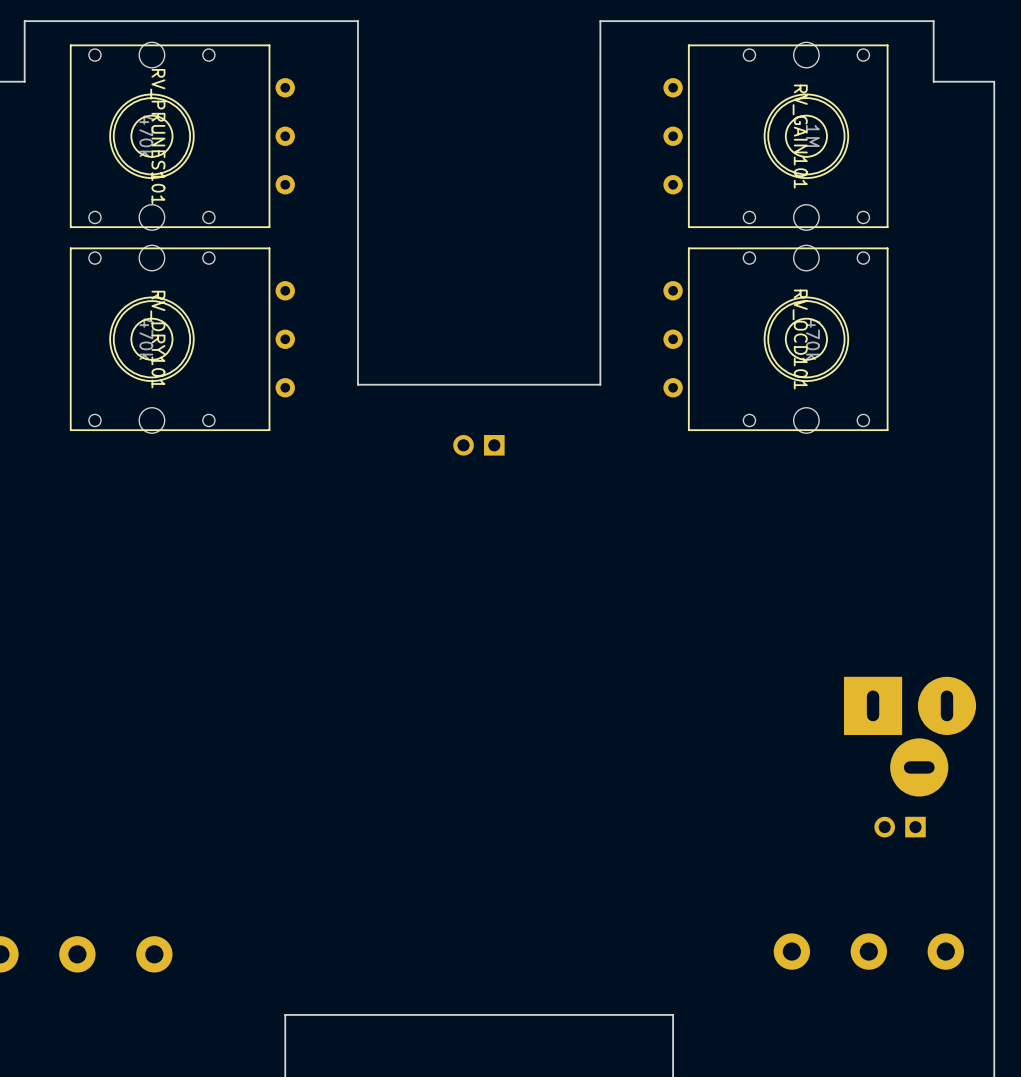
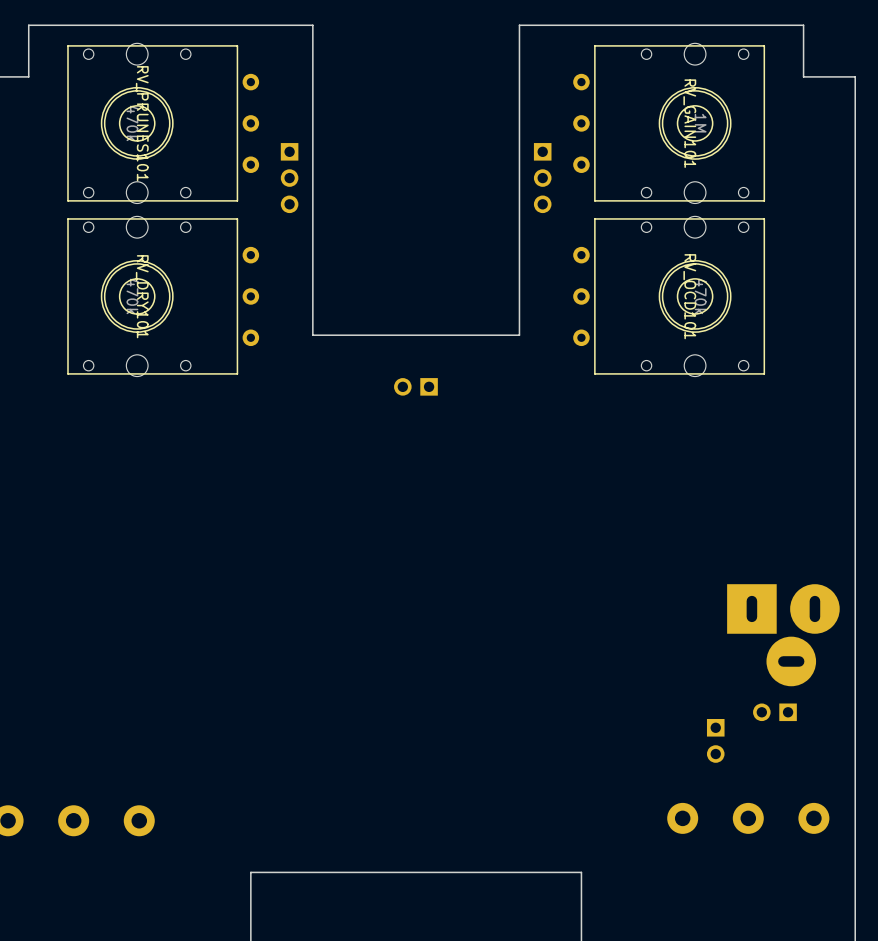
part: none -> (289, 178)
part: none -> (542, 178)
part: none -> (715, 740)

